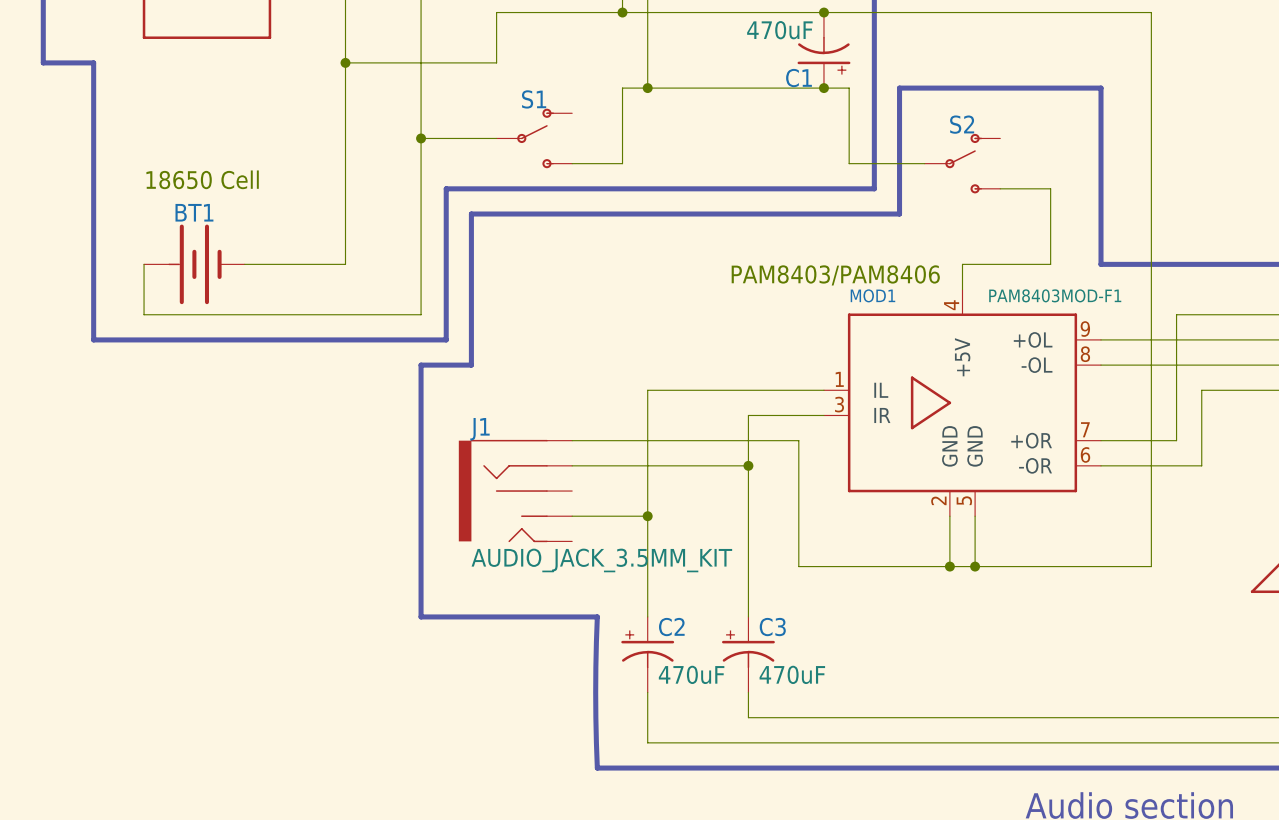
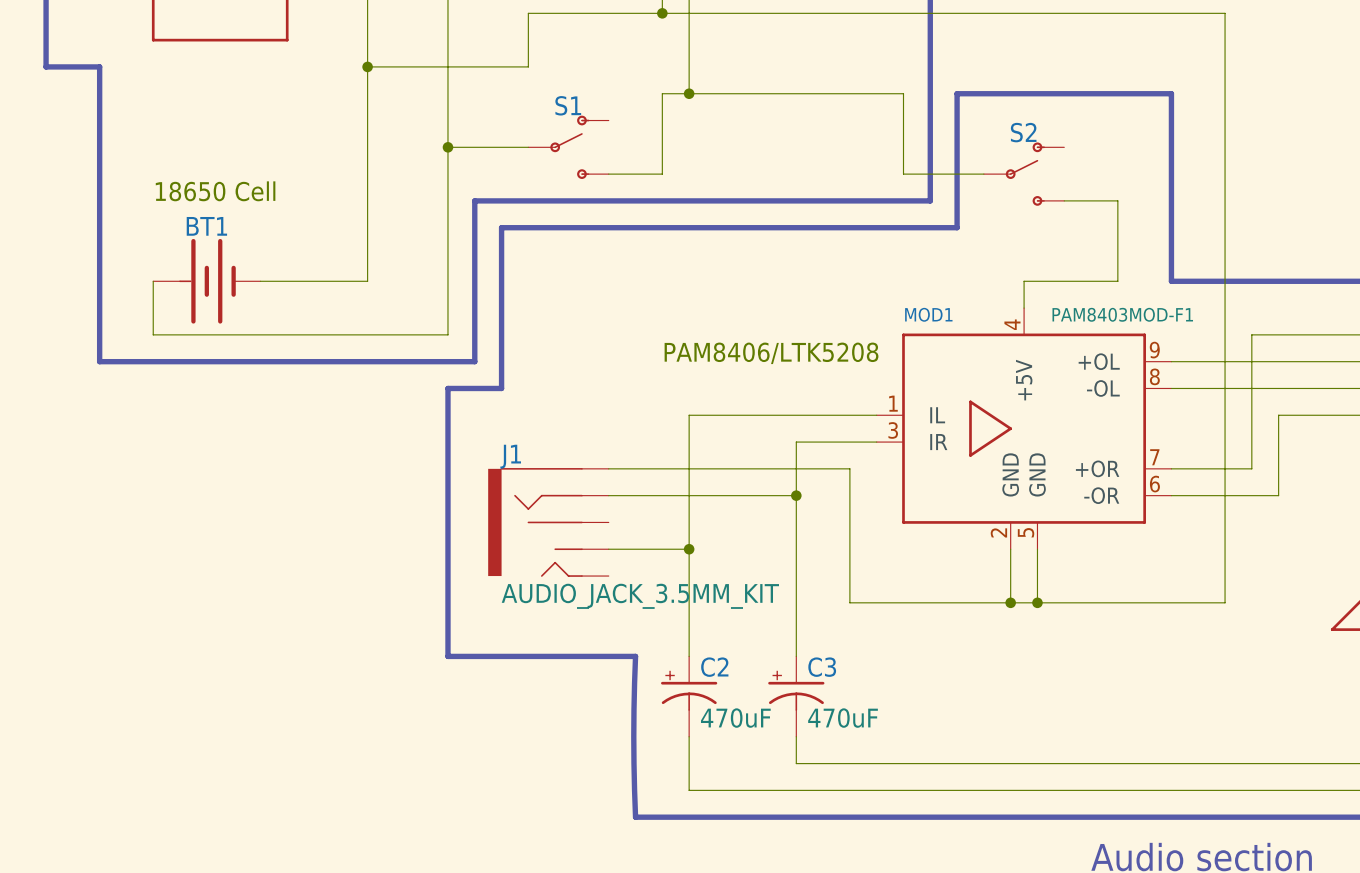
junction: (823, 12) -> none
C1: 470uF (823, 50) -> none
junction: (823, 88) -> none
text: PAM8403/PAM8406 (835, 275) -> none
text: none -> PAM8406/LTK5208 (771, 353)

